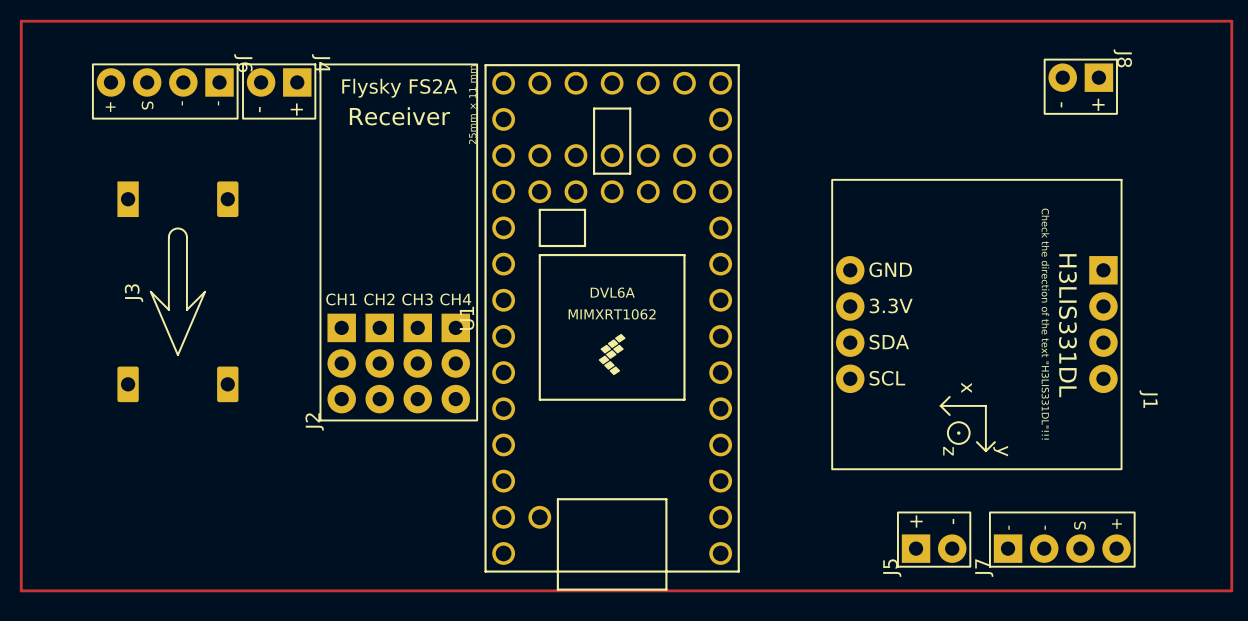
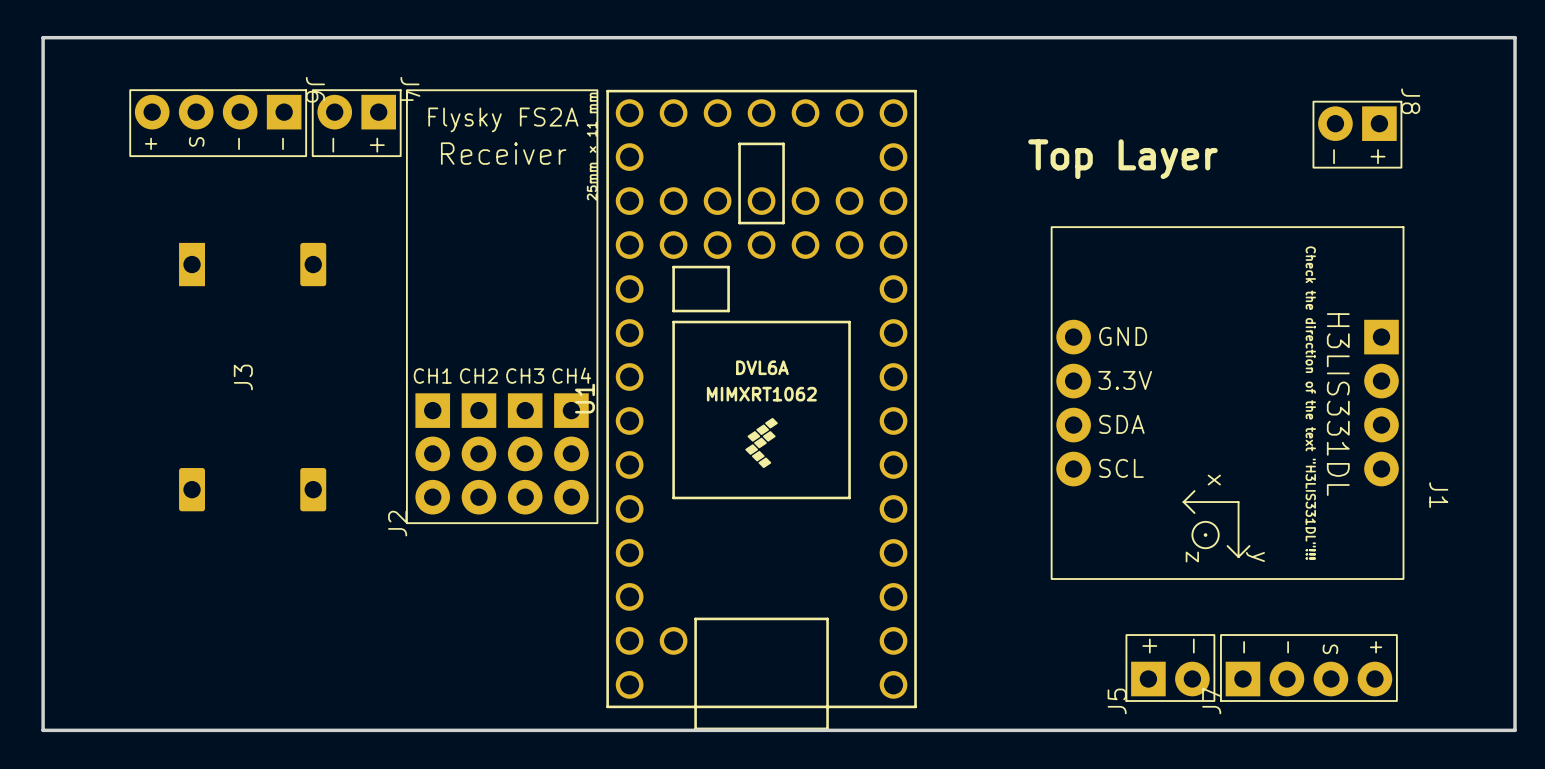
top track: (21, 21) (1231, 21) (1231, 590) (21, 590) (21, 21) -> none
board edge: none -> (43, 37) (1515, 37) (1515, 730) (43, 730) (43, 37)
J8 position: (1080, 86) -> (1357, 134)
text: none -> Top Layer (1122, 159)
J3 footprint: [117, 181, 239, 403] -> [179, 242, 327, 512]
J3 name position: J3 (134, 293) -> J3 (243, 377)
J1 position: (976, 324) -> (1227, 403)
J5 position: (934, 539) -> (1170, 668)

